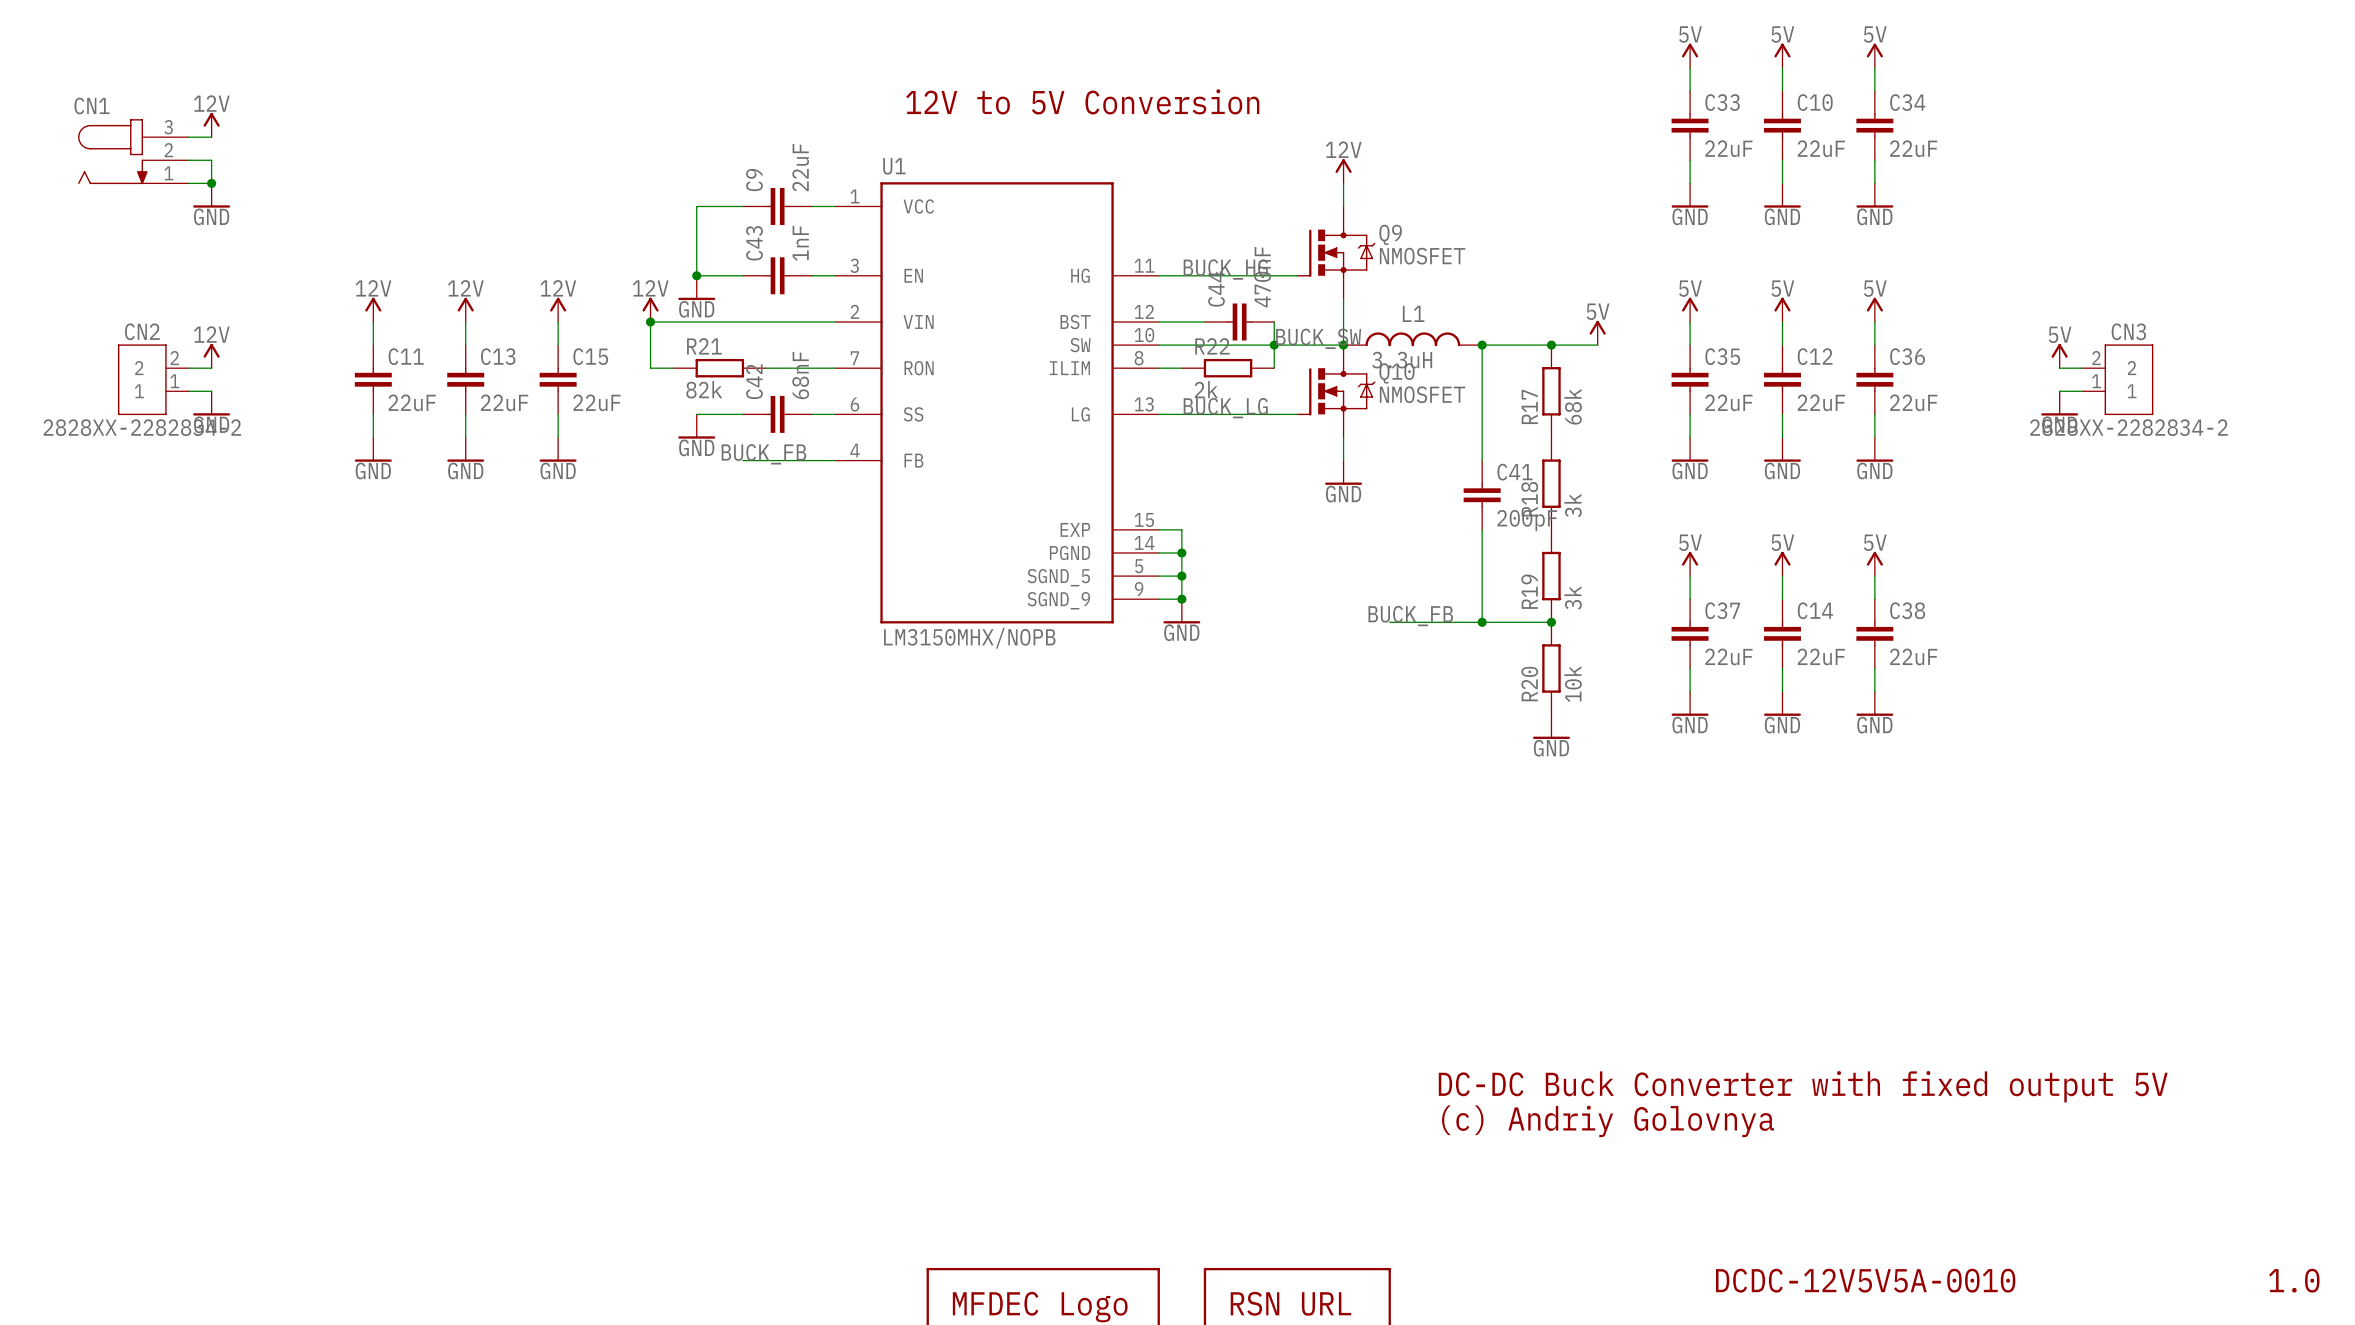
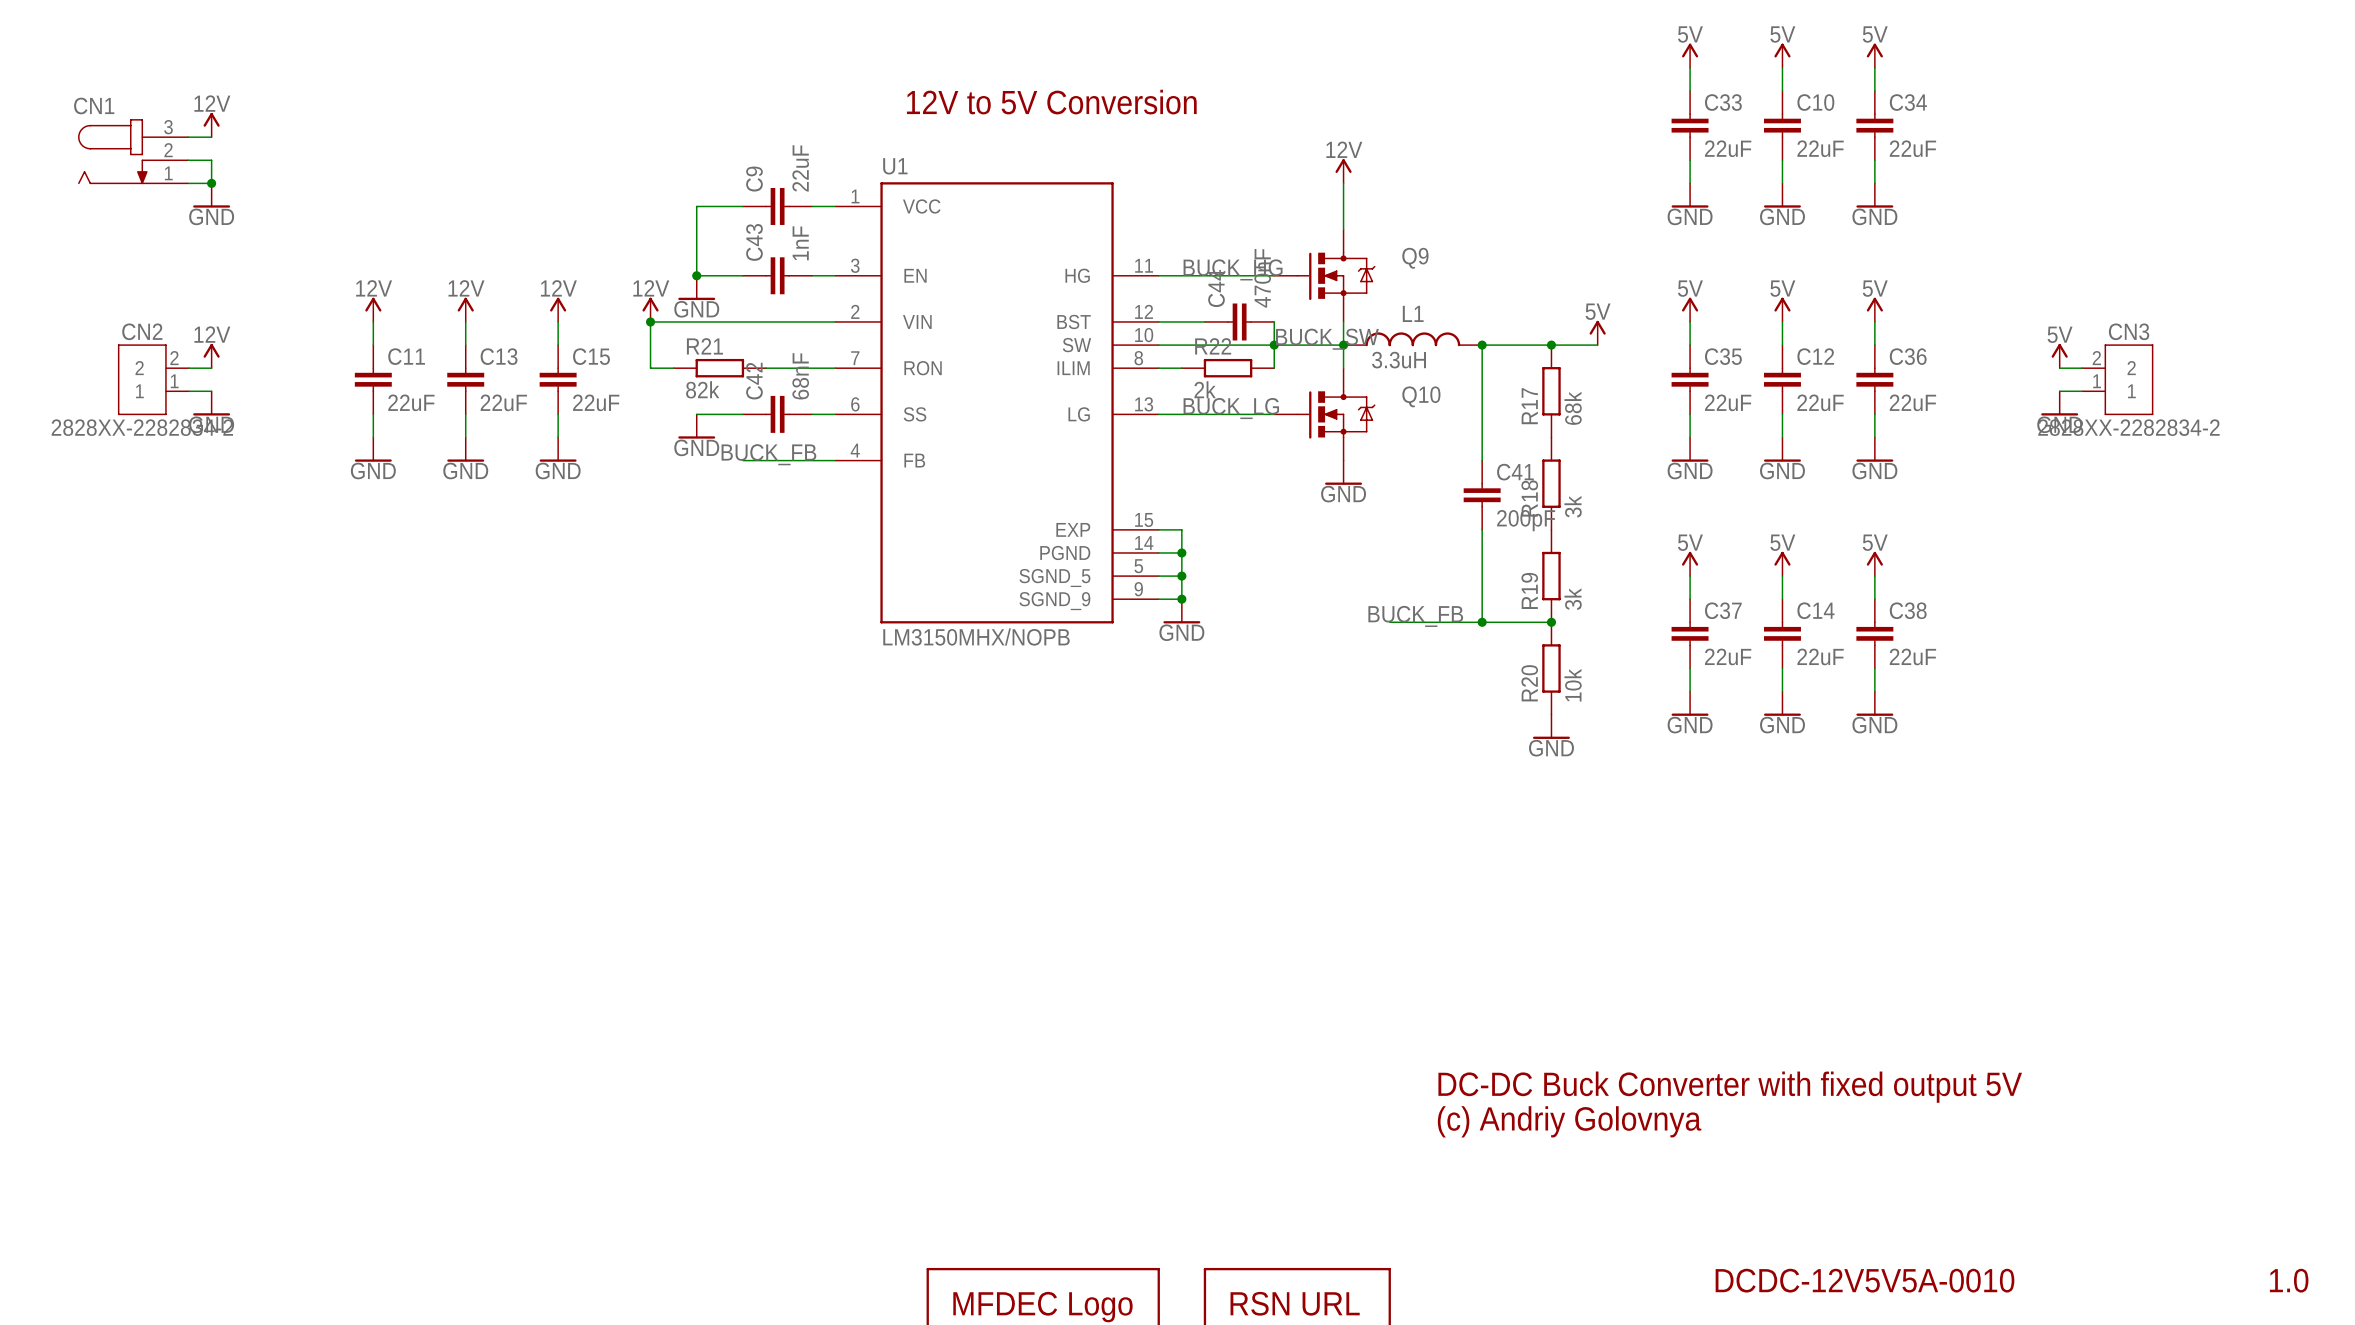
Q9 symbol: [1296, 206, 1376, 299] -> [1274, 229, 1376, 322]
Q9 name position: Q9 (1390, 234) -> Q9 (1415, 258)
Q9 value: NMOSFET (1422, 256) -> none
Q10 symbol: [1296, 345, 1376, 438] -> [1274, 368, 1376, 461]
Q10 name position: Q10 (1396, 373) -> Q10 (1421, 396)
Q10 value: NMOSFET (1422, 394) -> none

